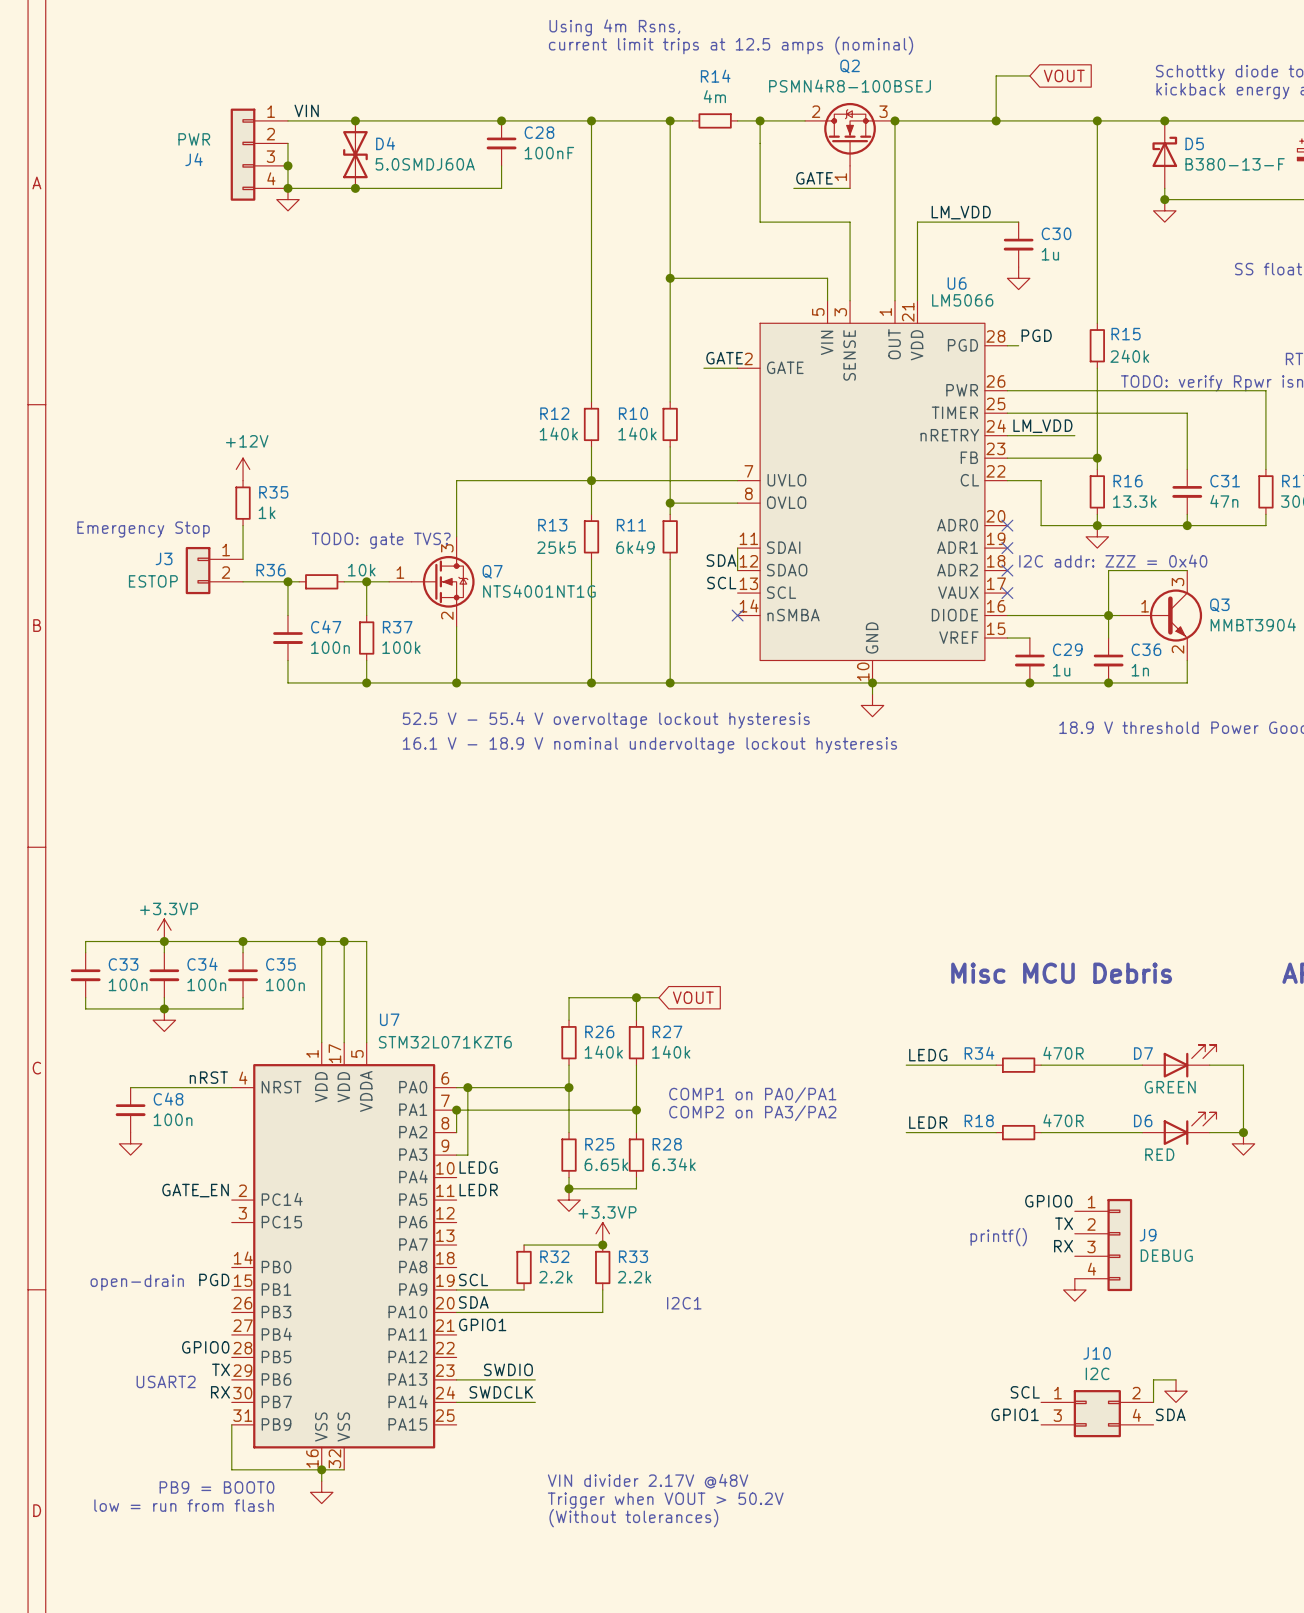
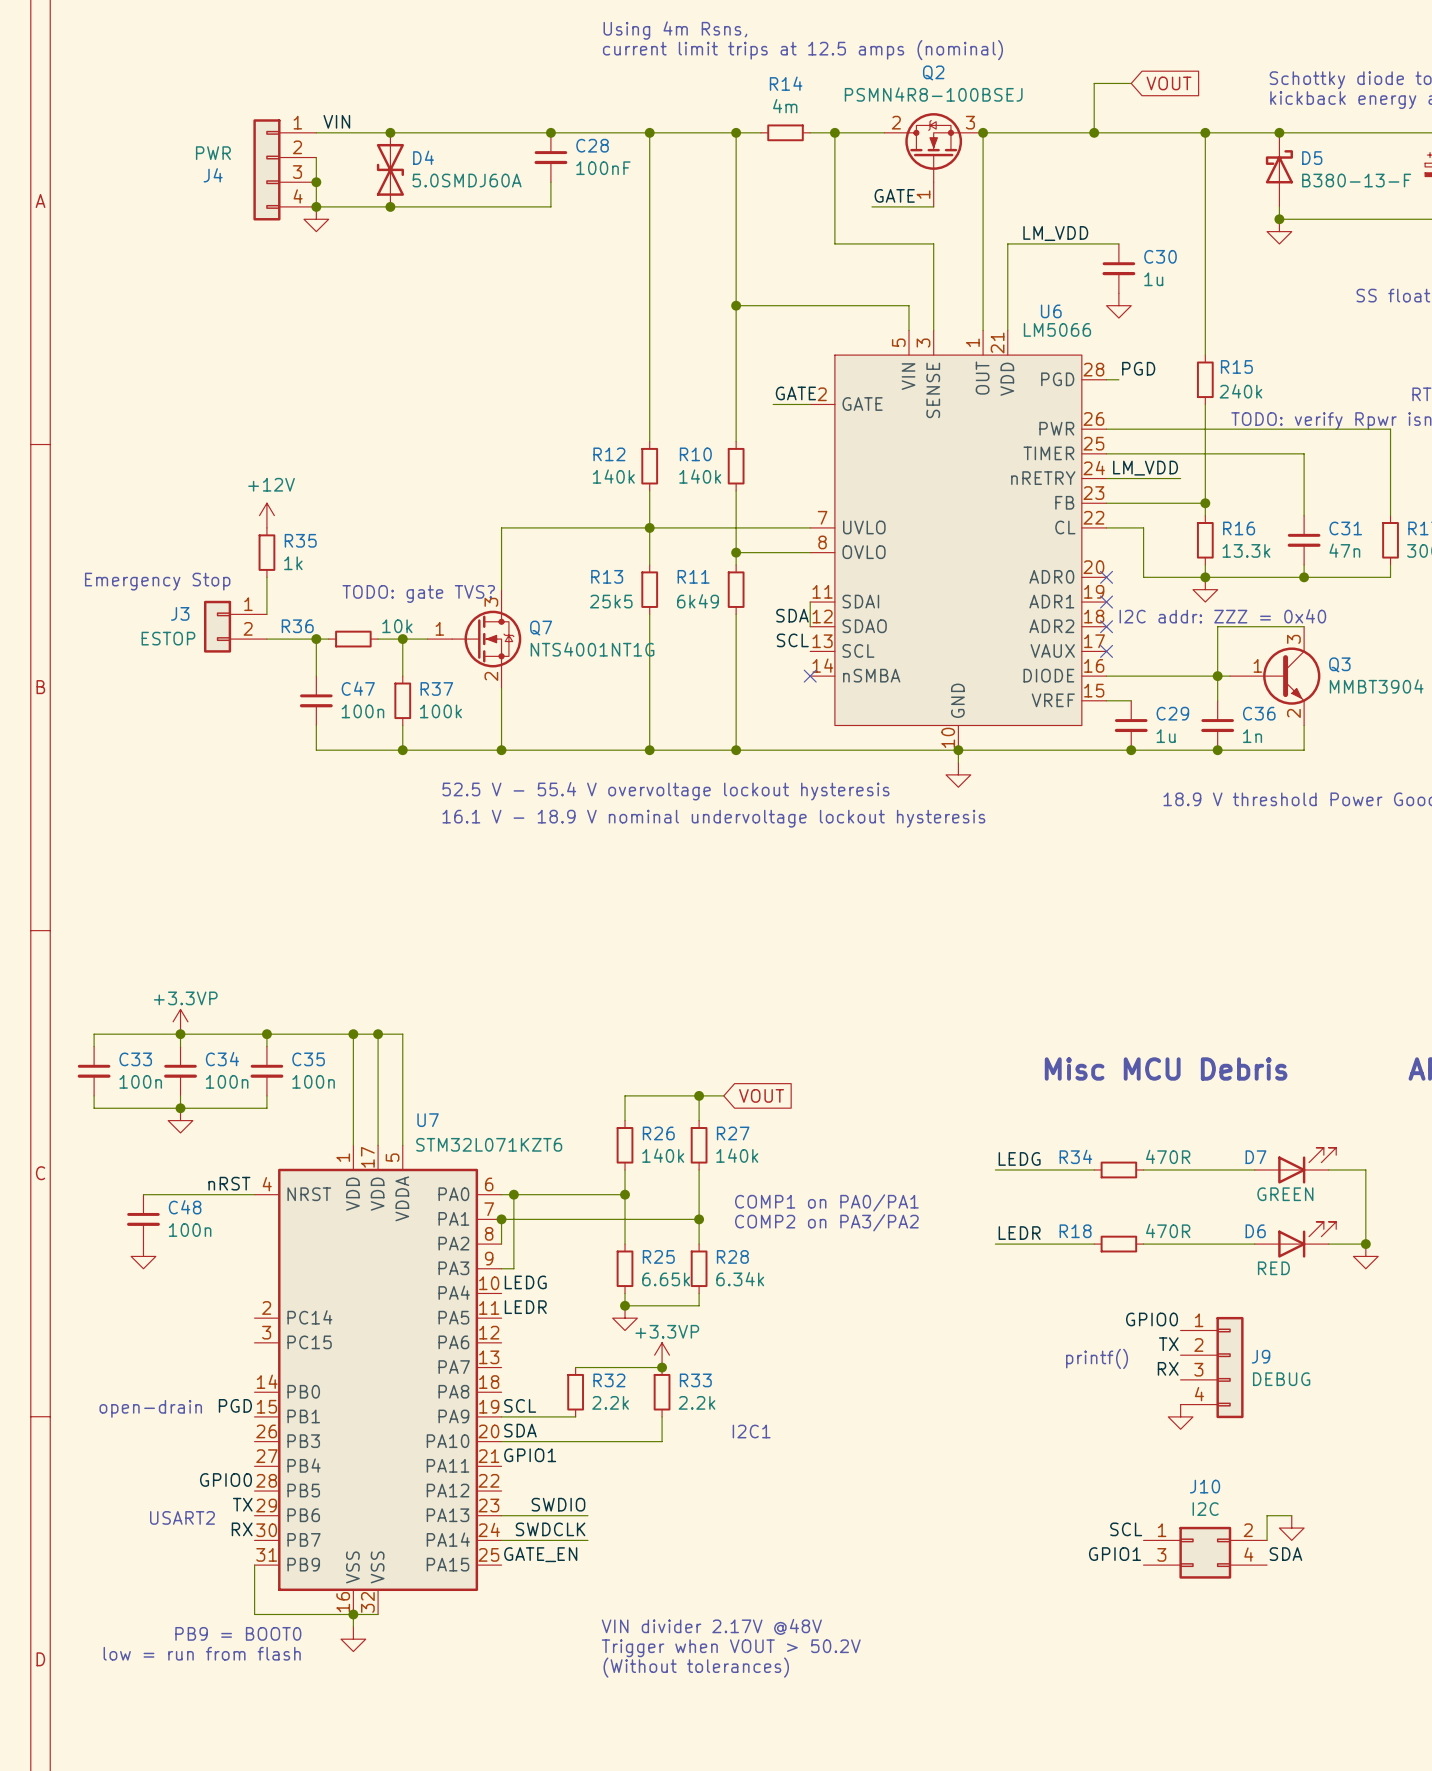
label: GATE_EN (195, 1190) -> none
label: none -> GATE_EN (540, 1554)

